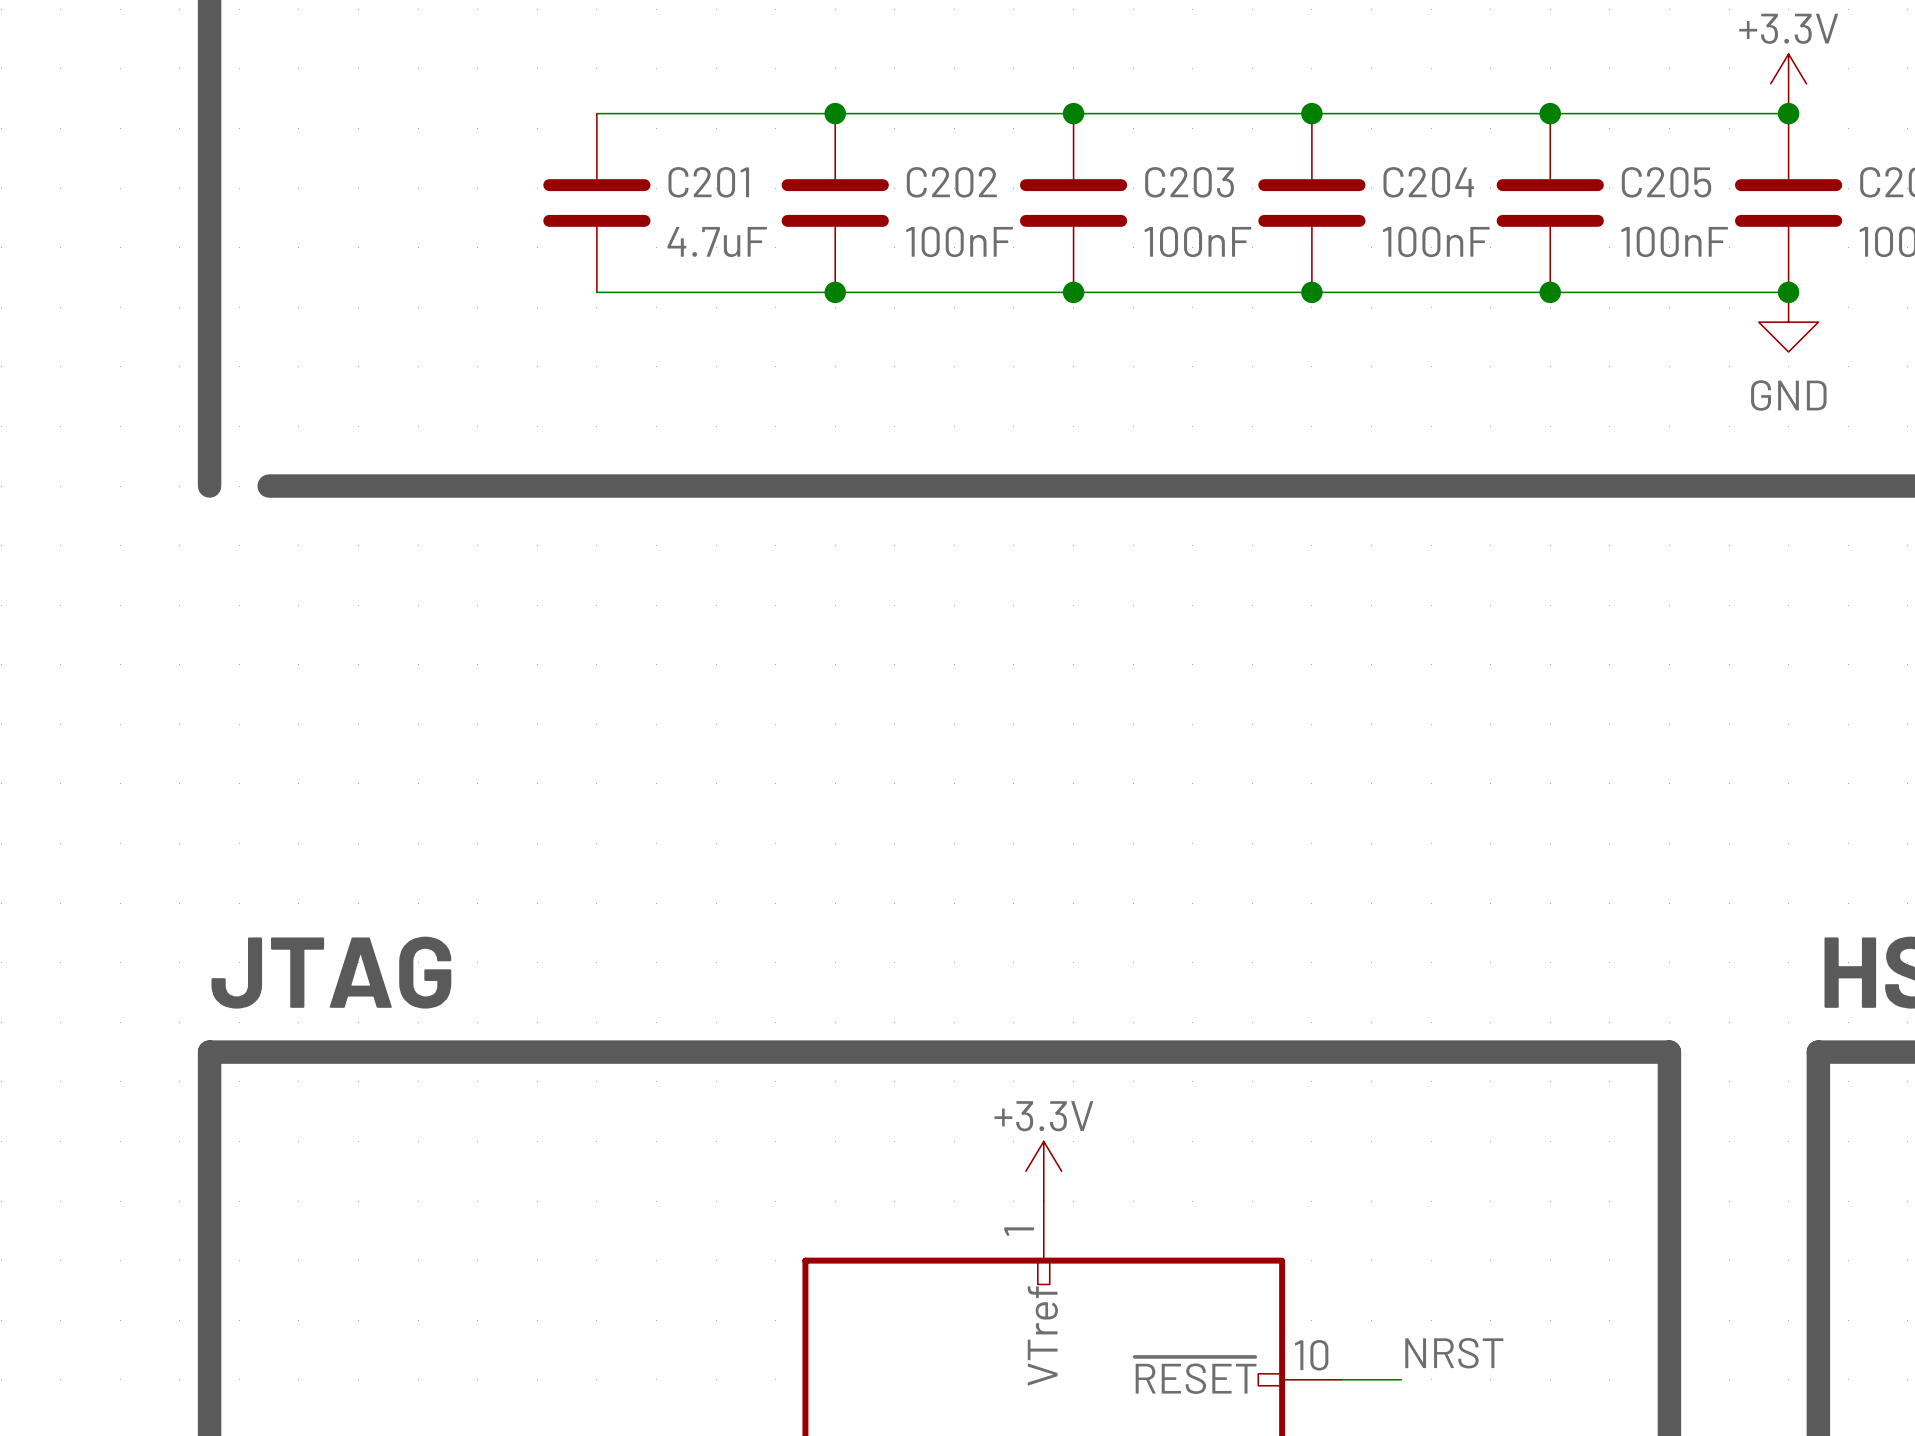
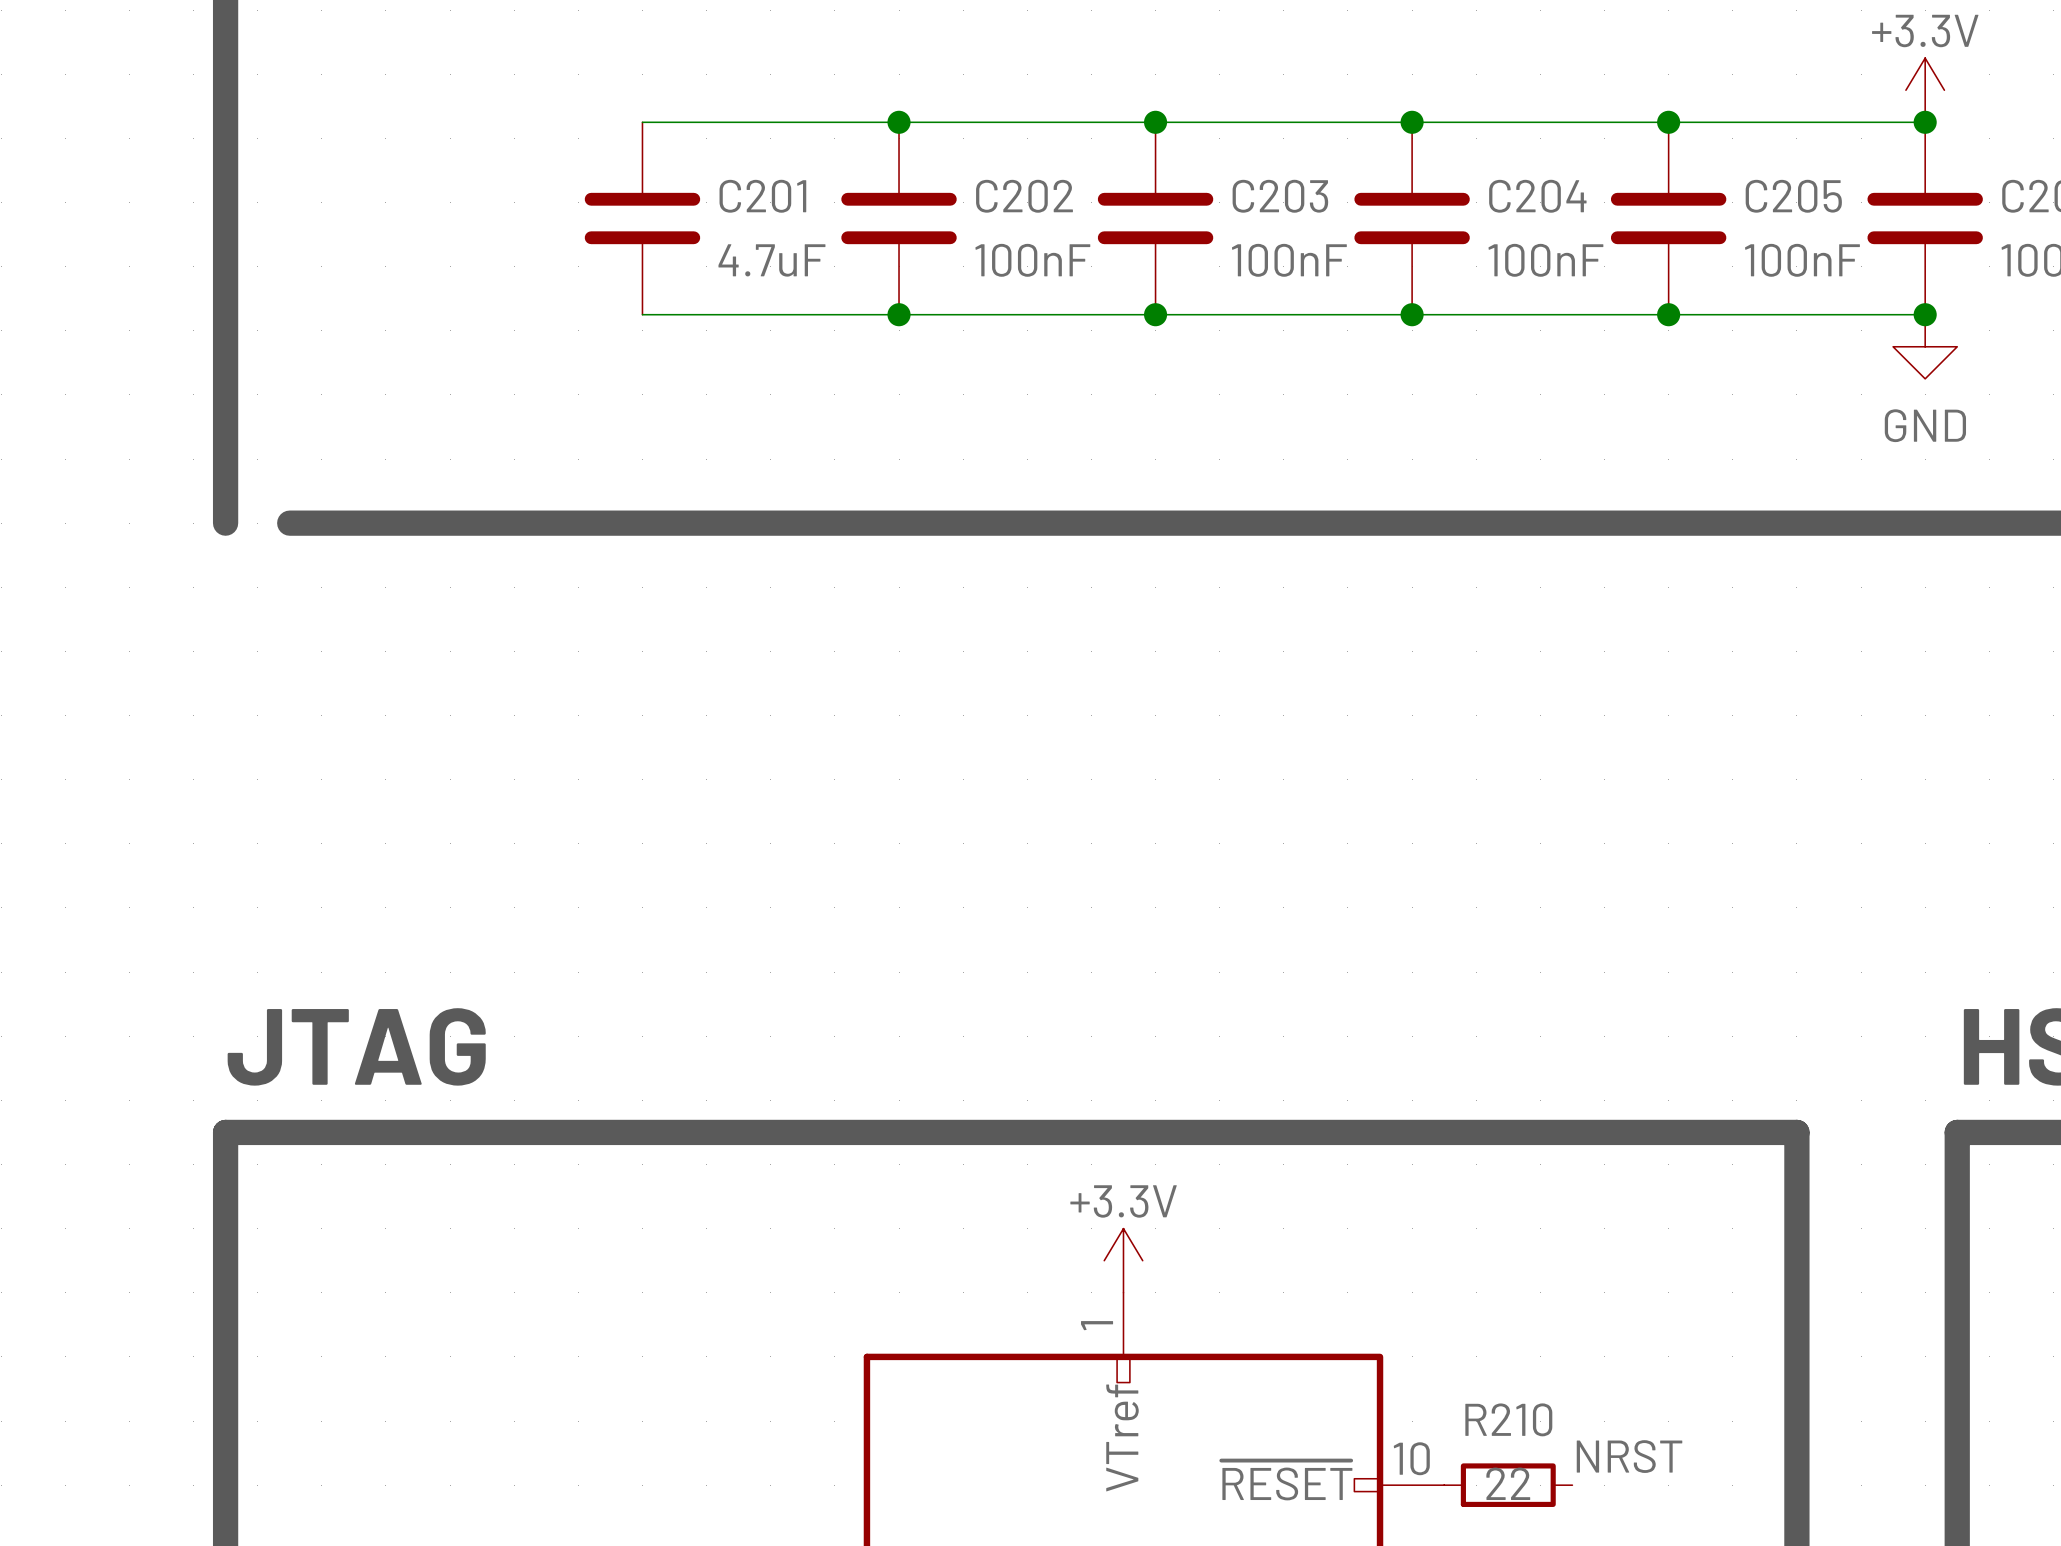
label position: NRST (1454, 1353) -> NRST (1629, 1456)
wire: (1341, 1379) (1401, 1379) -> none
R210: none -> 22 (1508, 1485)

